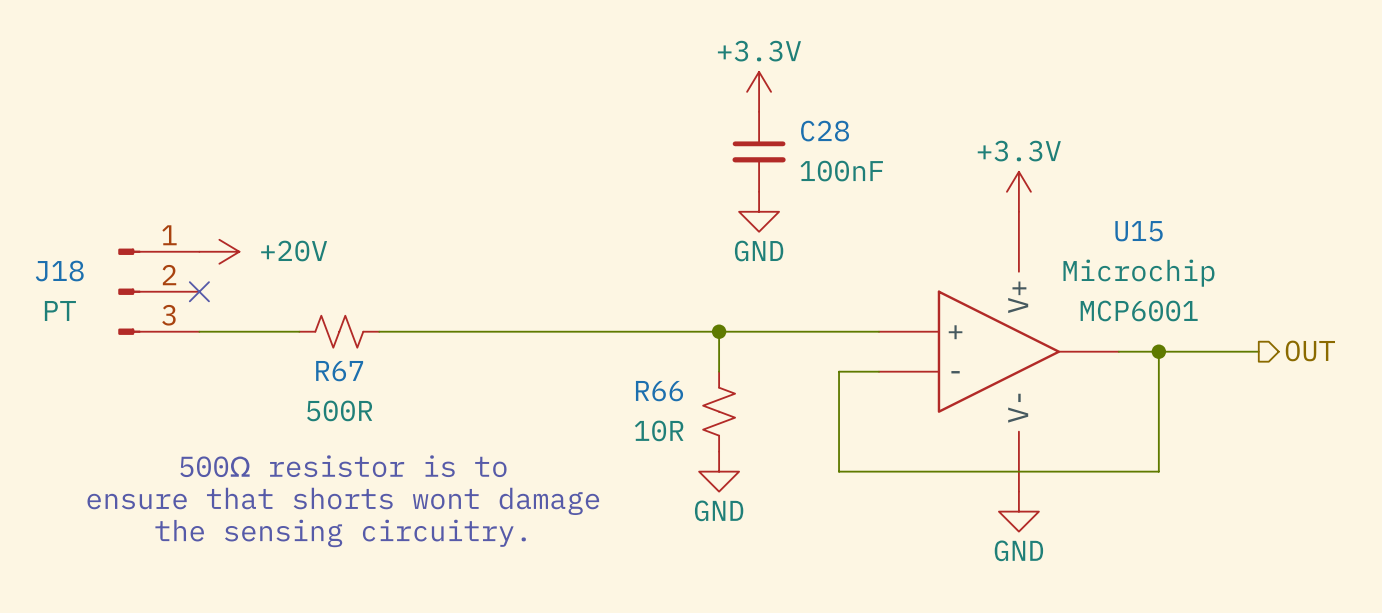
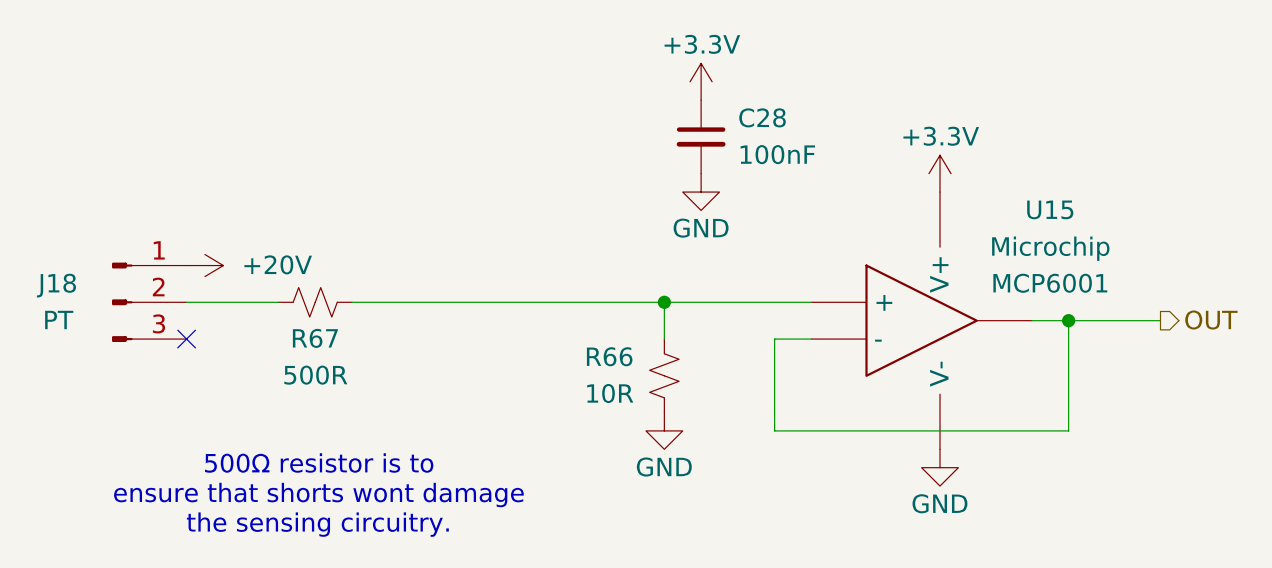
power symbol position: +20V (219, 251) -> +20V (204, 265)
J18 position: (158, 291) -> (149, 302)
no-connect mark position: (199, 291) -> (186, 339)
text position: 500Ω resistor is to (343, 466) -> 500Ω resistor is to (319, 462)
text position: ensure that shorts wont damage (343, 501) -> ensure that shorts wont damage (318, 495)
text position: the sensing circuitry. (340, 533) -> the sensing circuitry. (317, 524)

